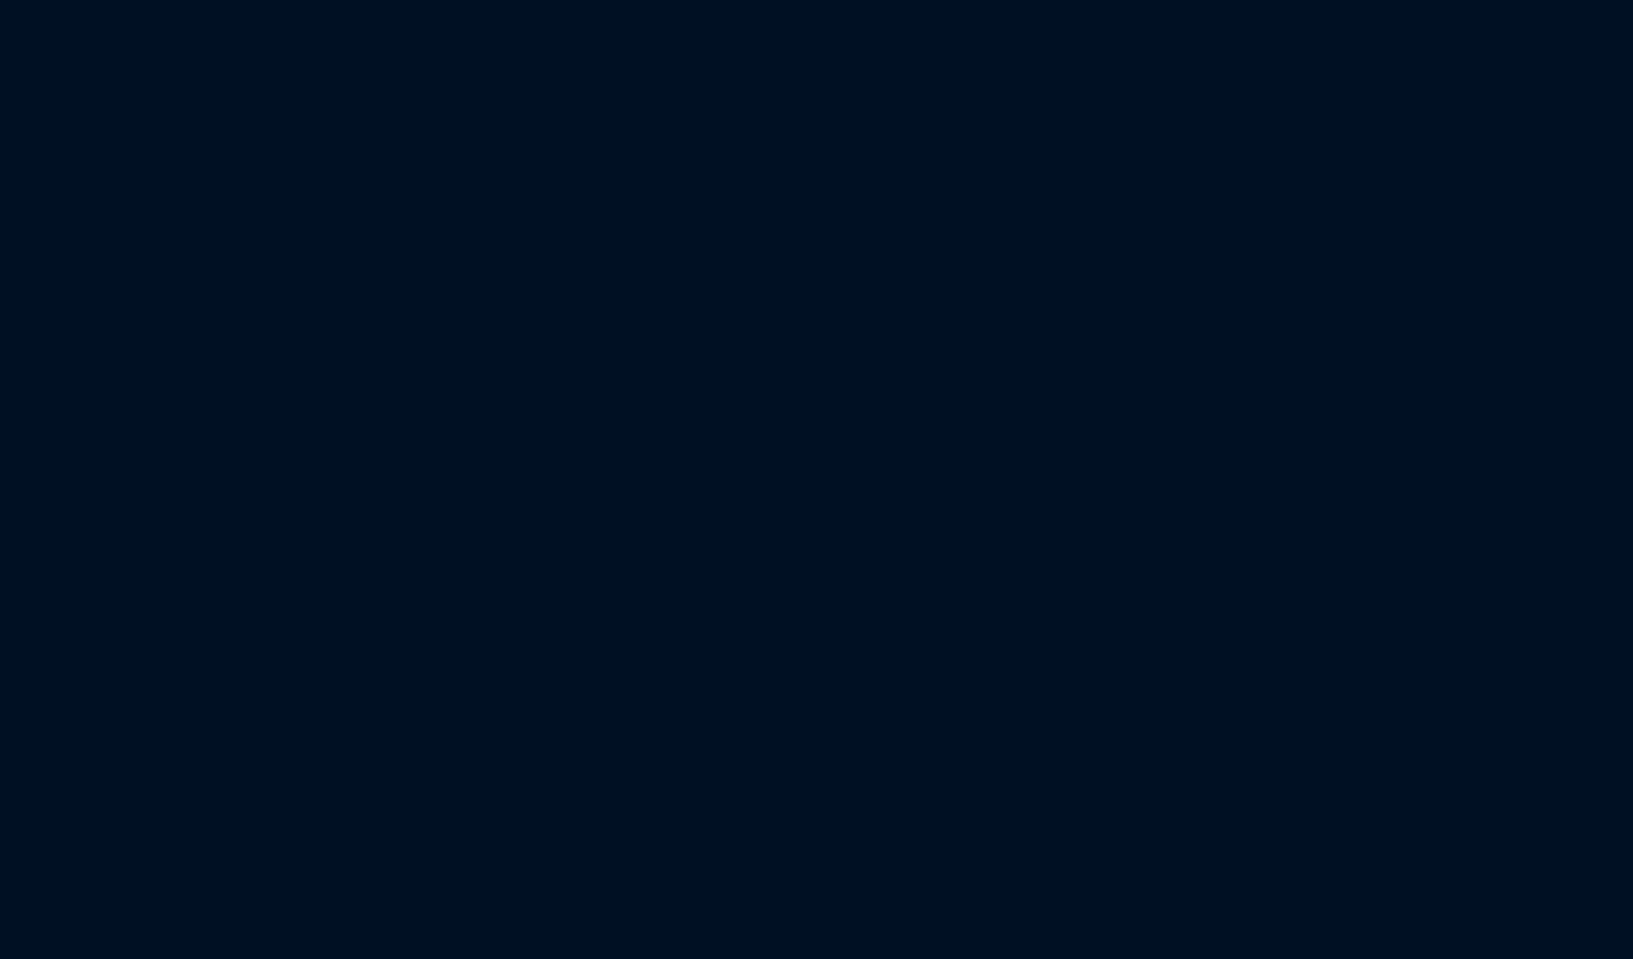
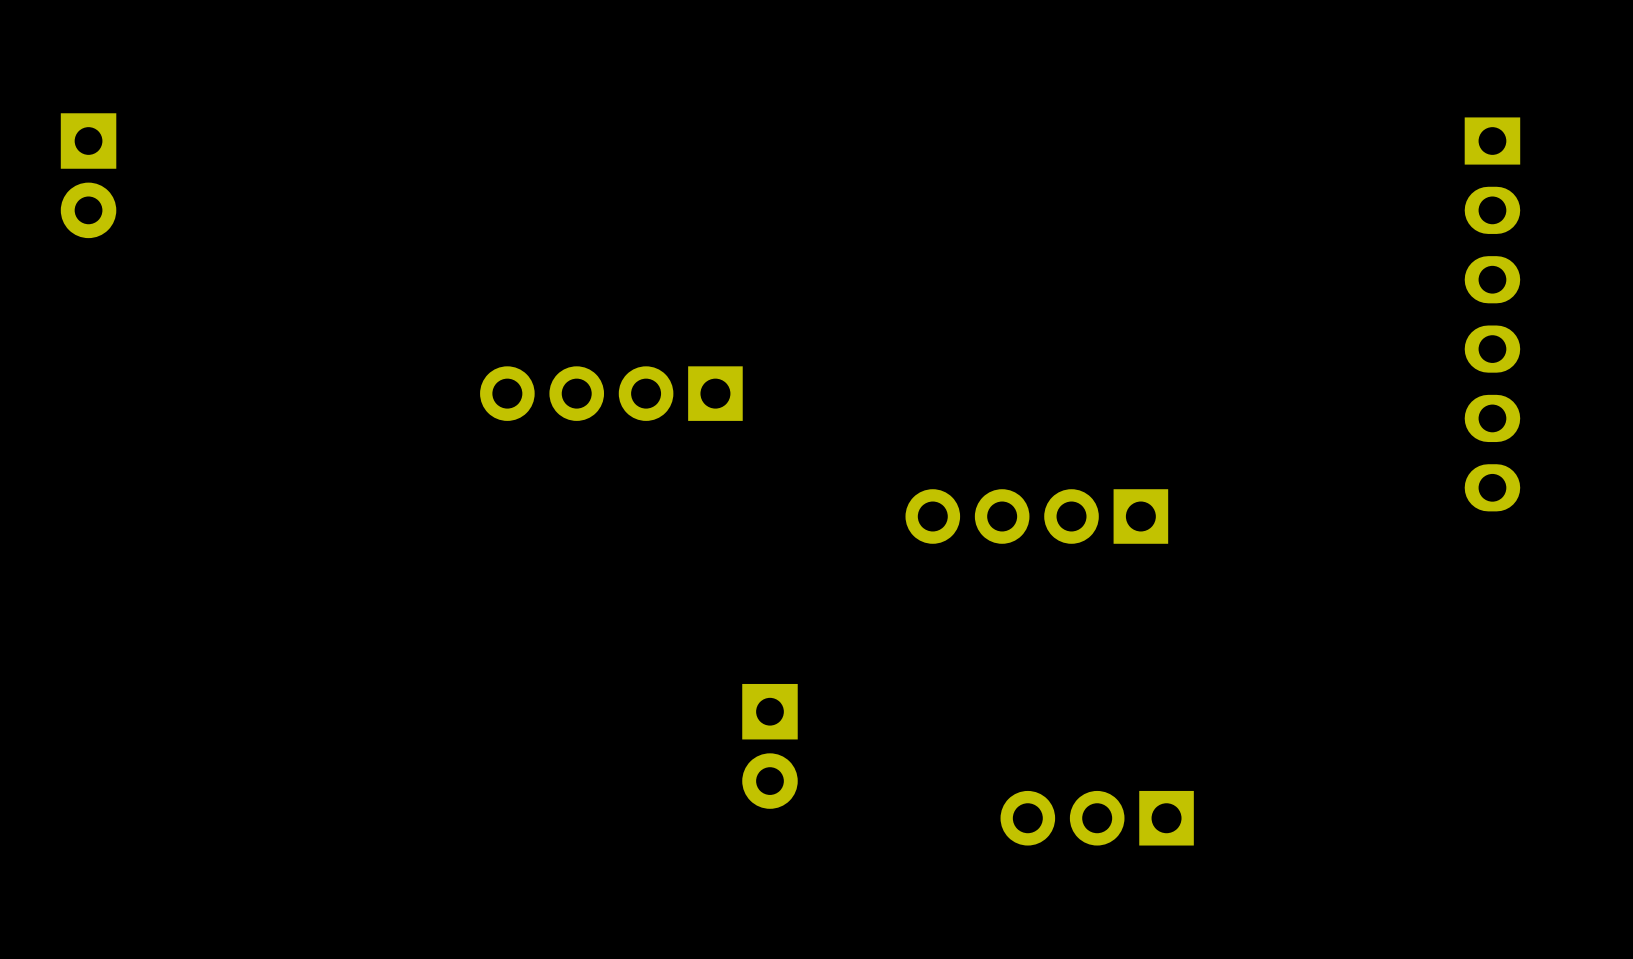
part: none -> (88, 175)
part: none -> (1492, 314)
part: none -> (611, 393)
part: none -> (1036, 516)
part: none -> (769, 746)
part: none -> (1097, 818)

